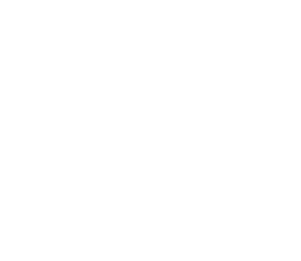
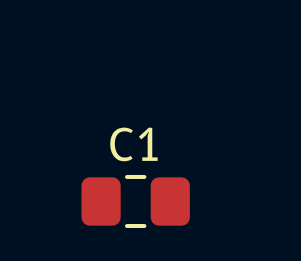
C1: none -> (135, 201)

